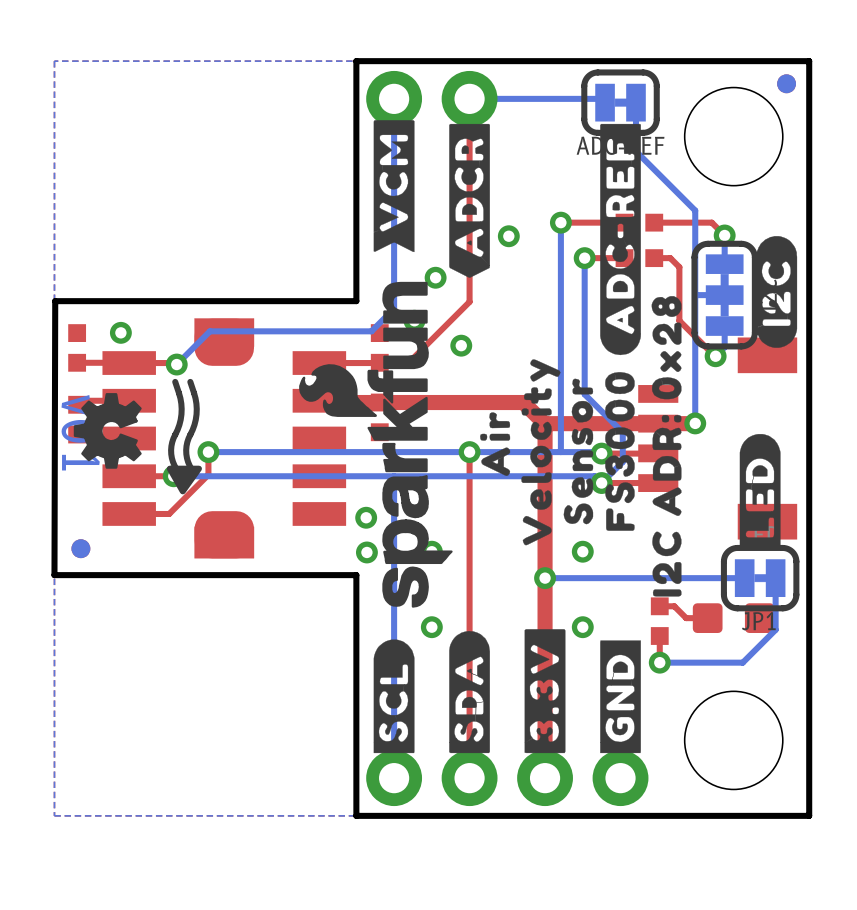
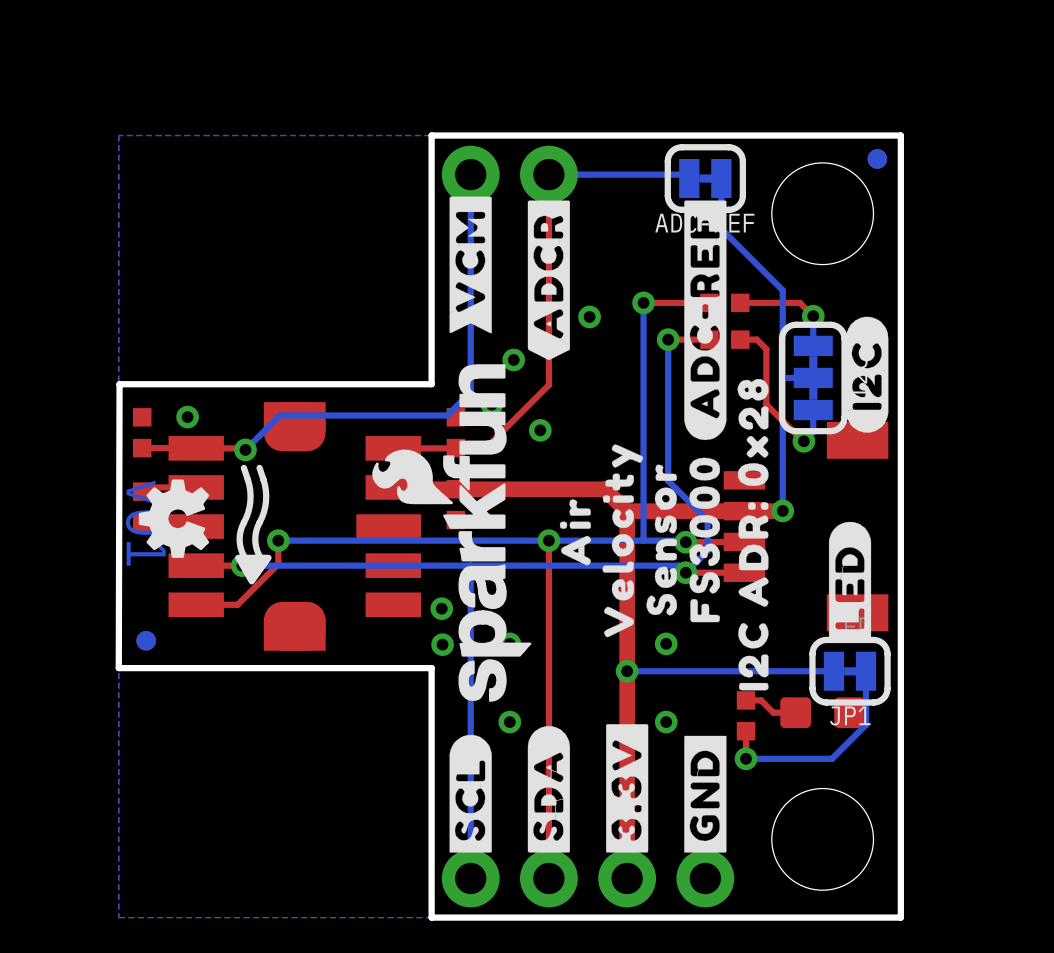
part footprint: [102, 318, 347, 559] -> [168, 402, 421, 651]

